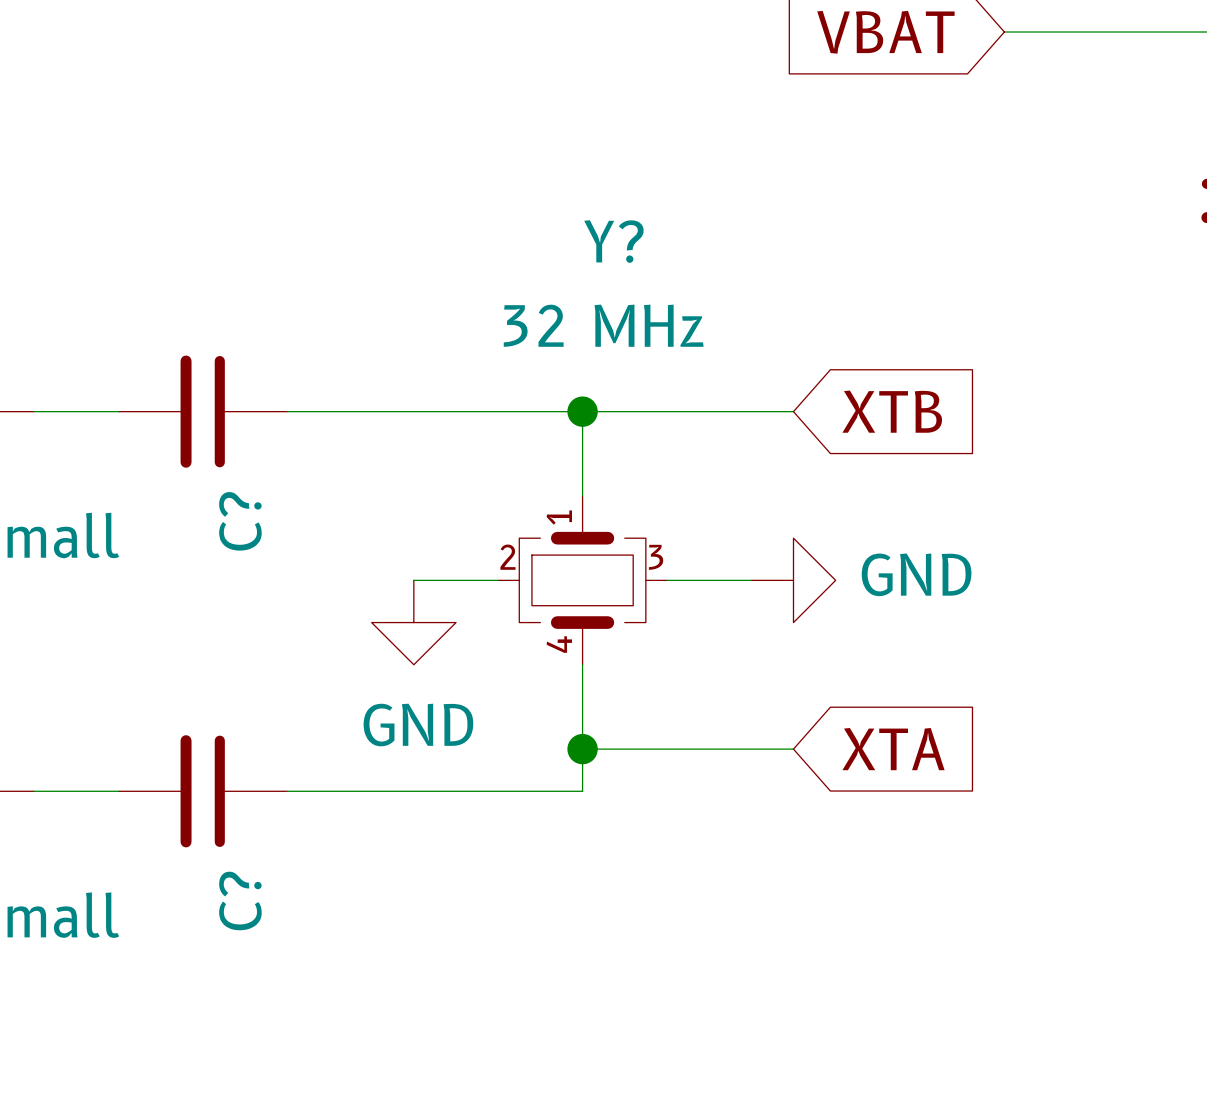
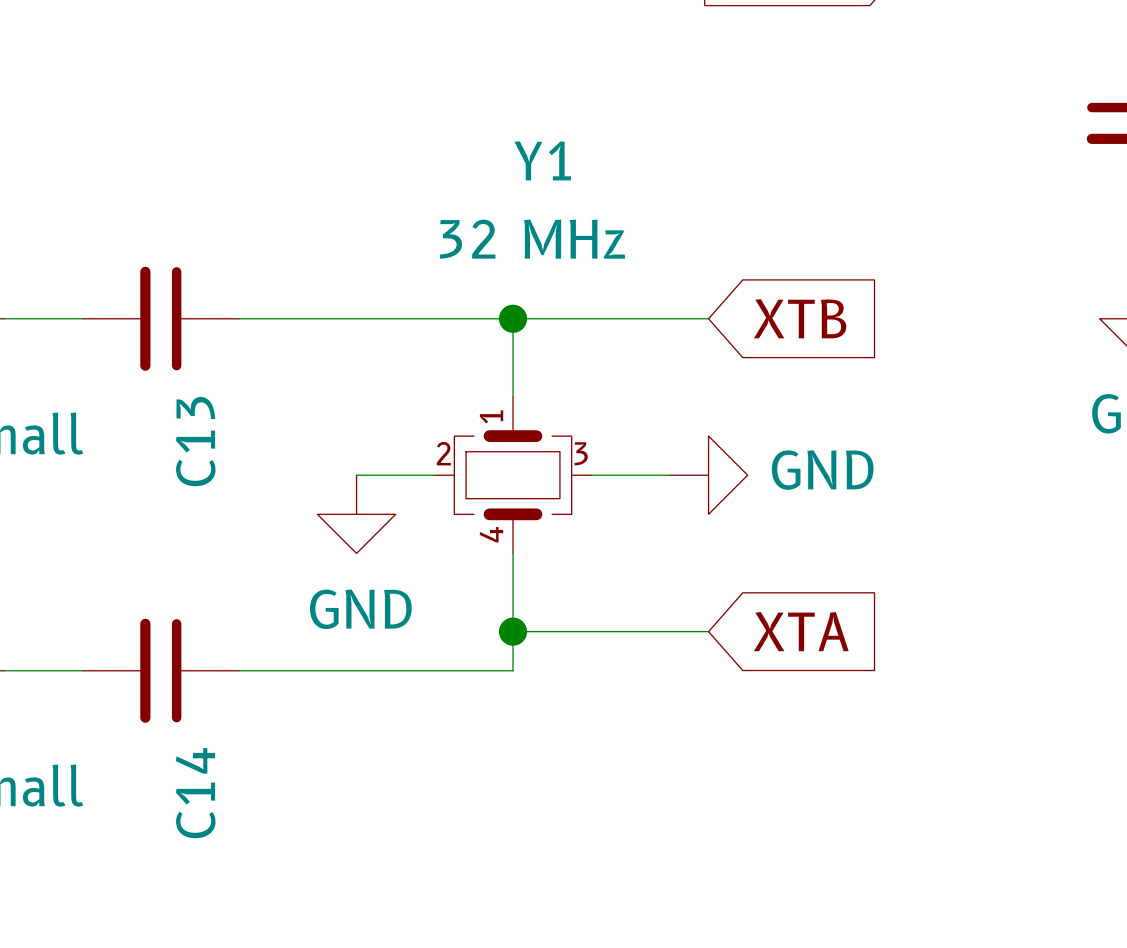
Y? name: Y? (613, 241) -> Y1 (542, 160)
C? name: C? (240, 521) -> C13 (195, 441)
C? name: C? (240, 900) -> C14 (195, 793)

